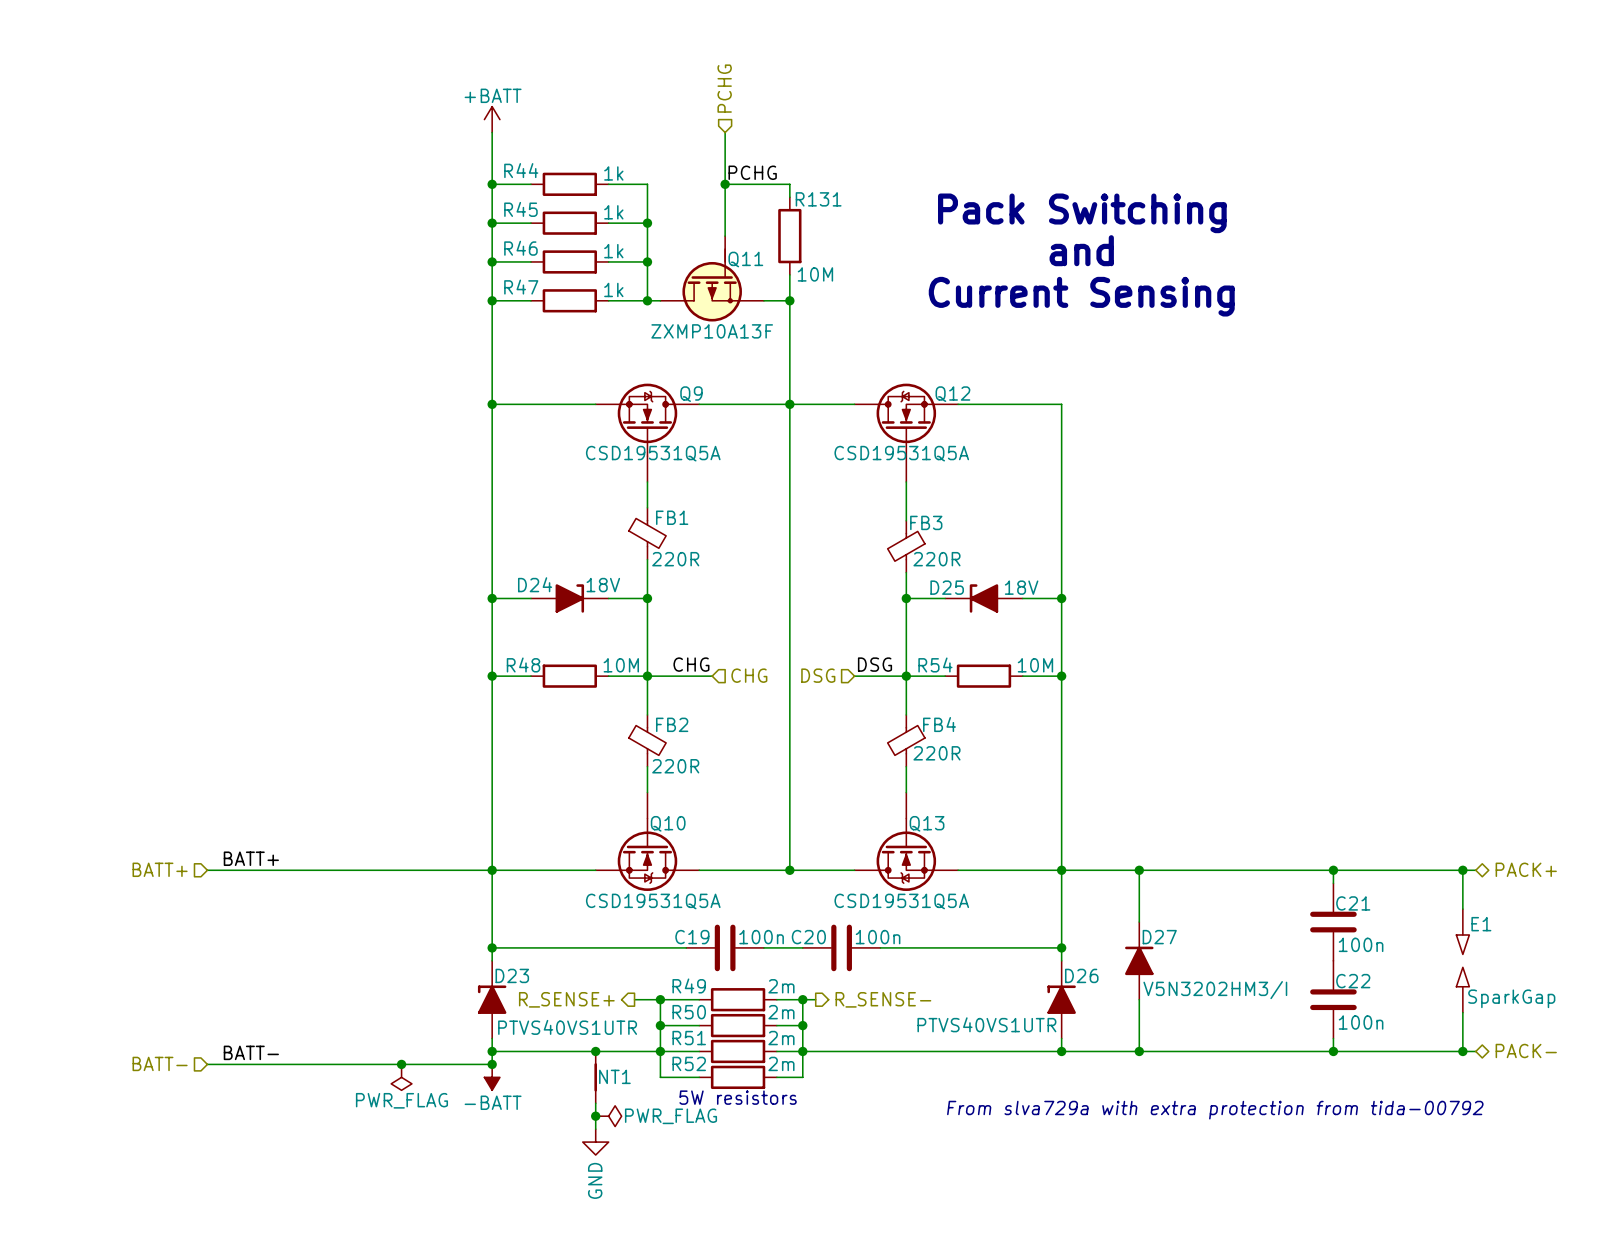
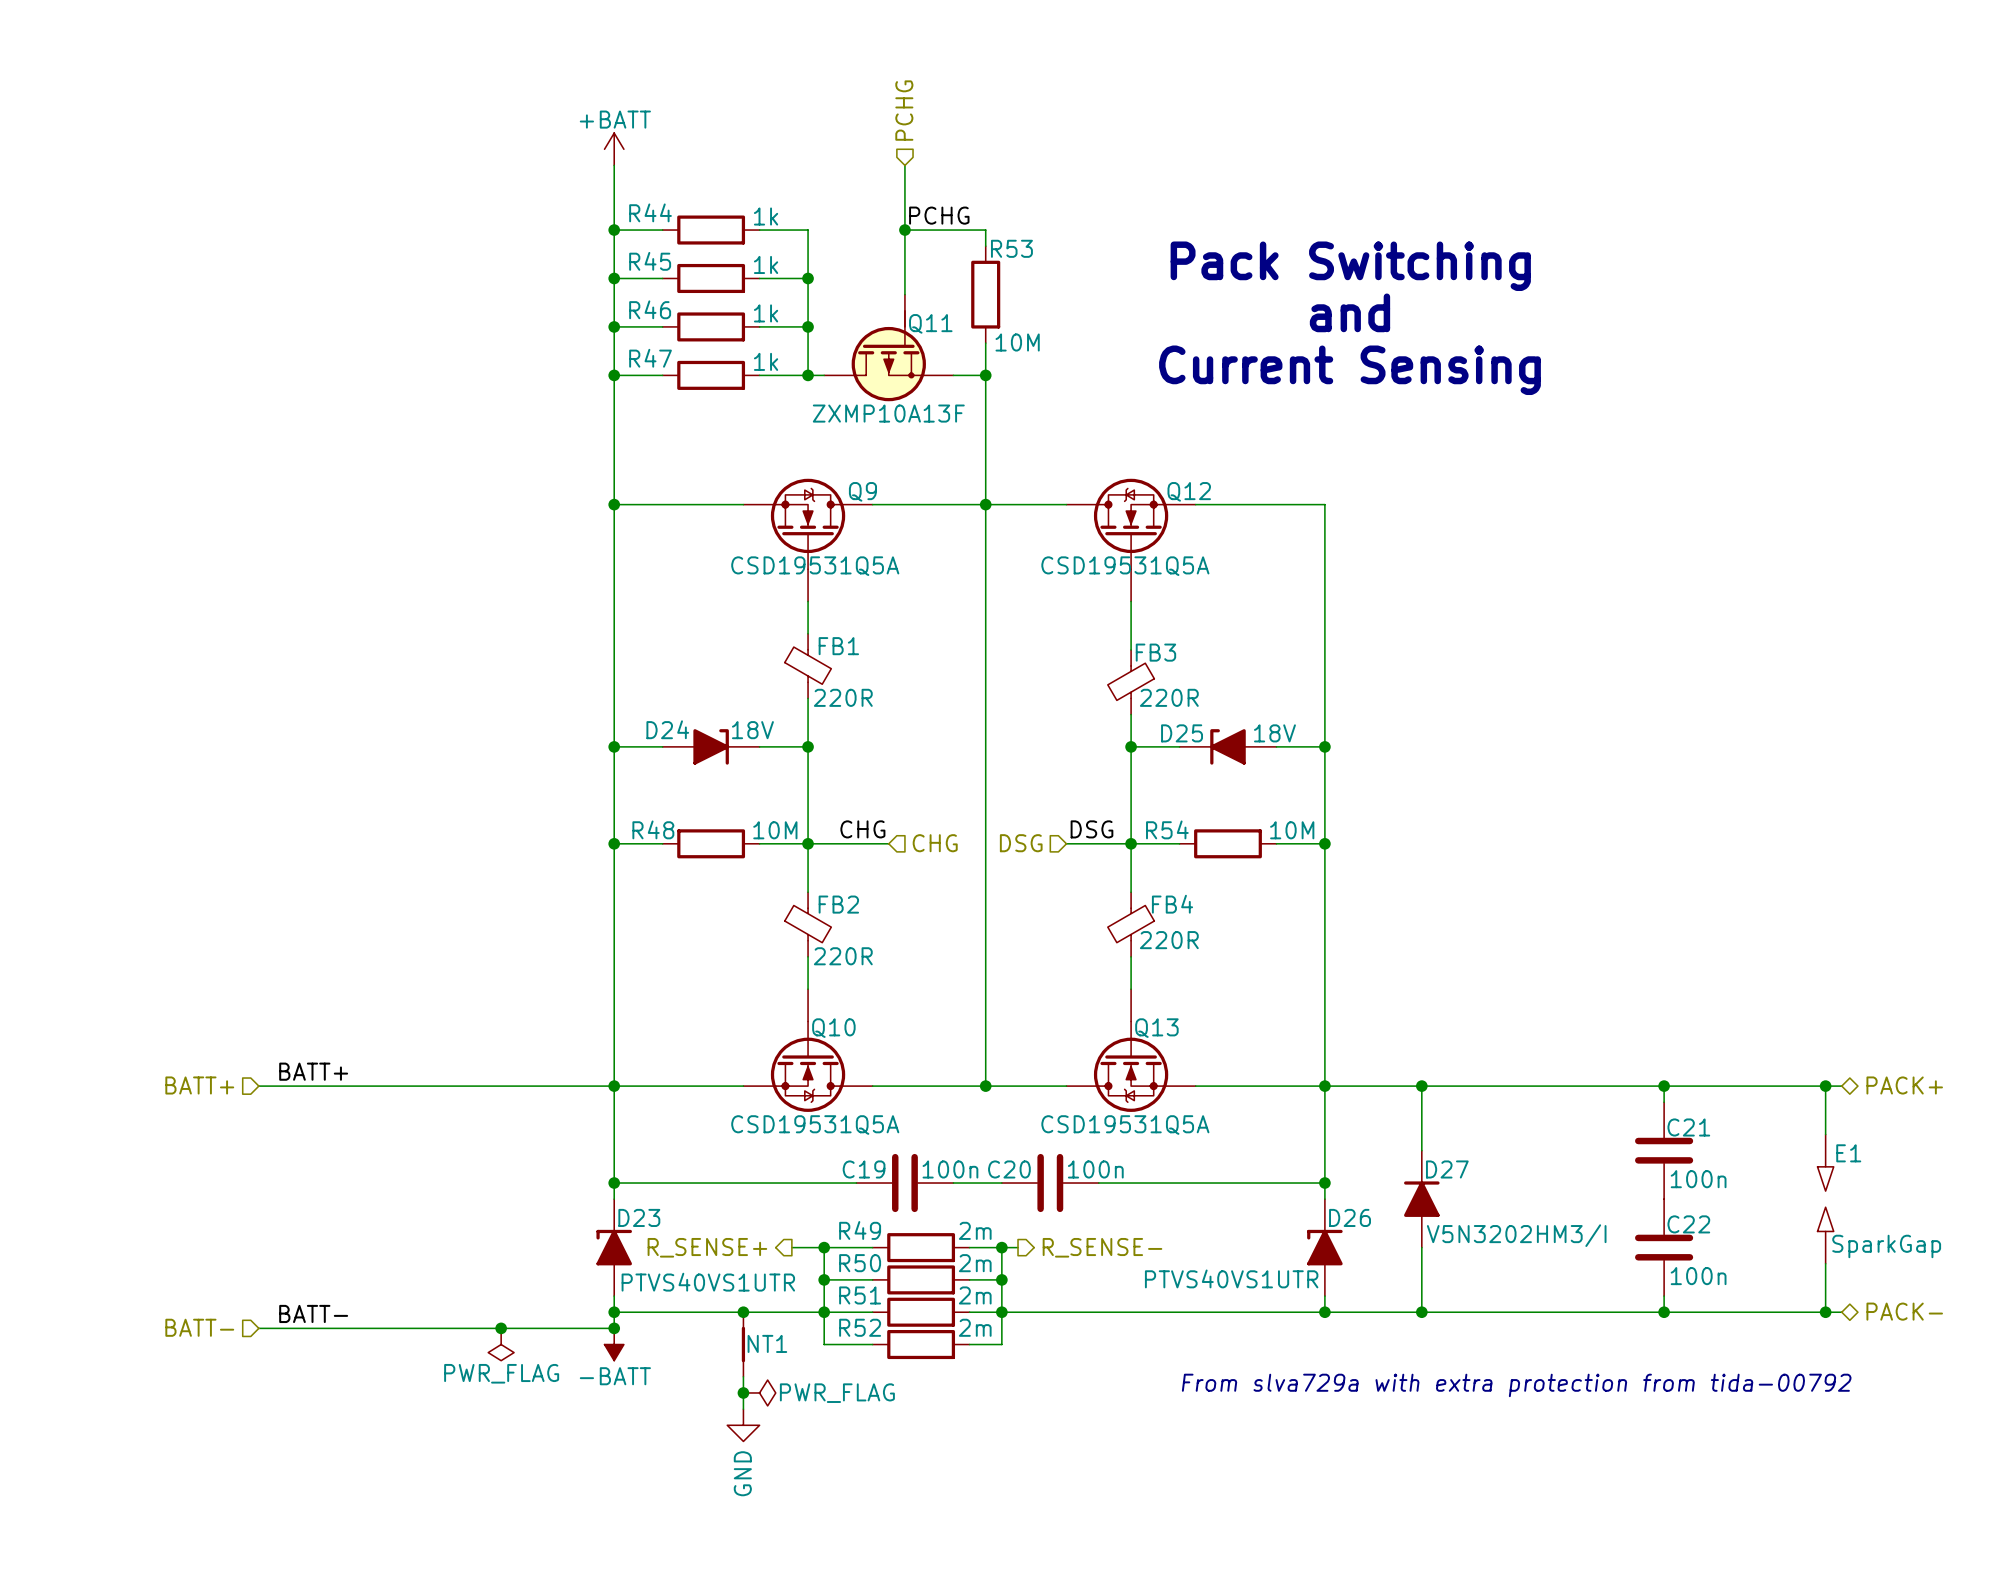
R131 name: R131 (818, 199) -> R53 (1011, 248)
text: 5W resistors (738, 1097) -> none

